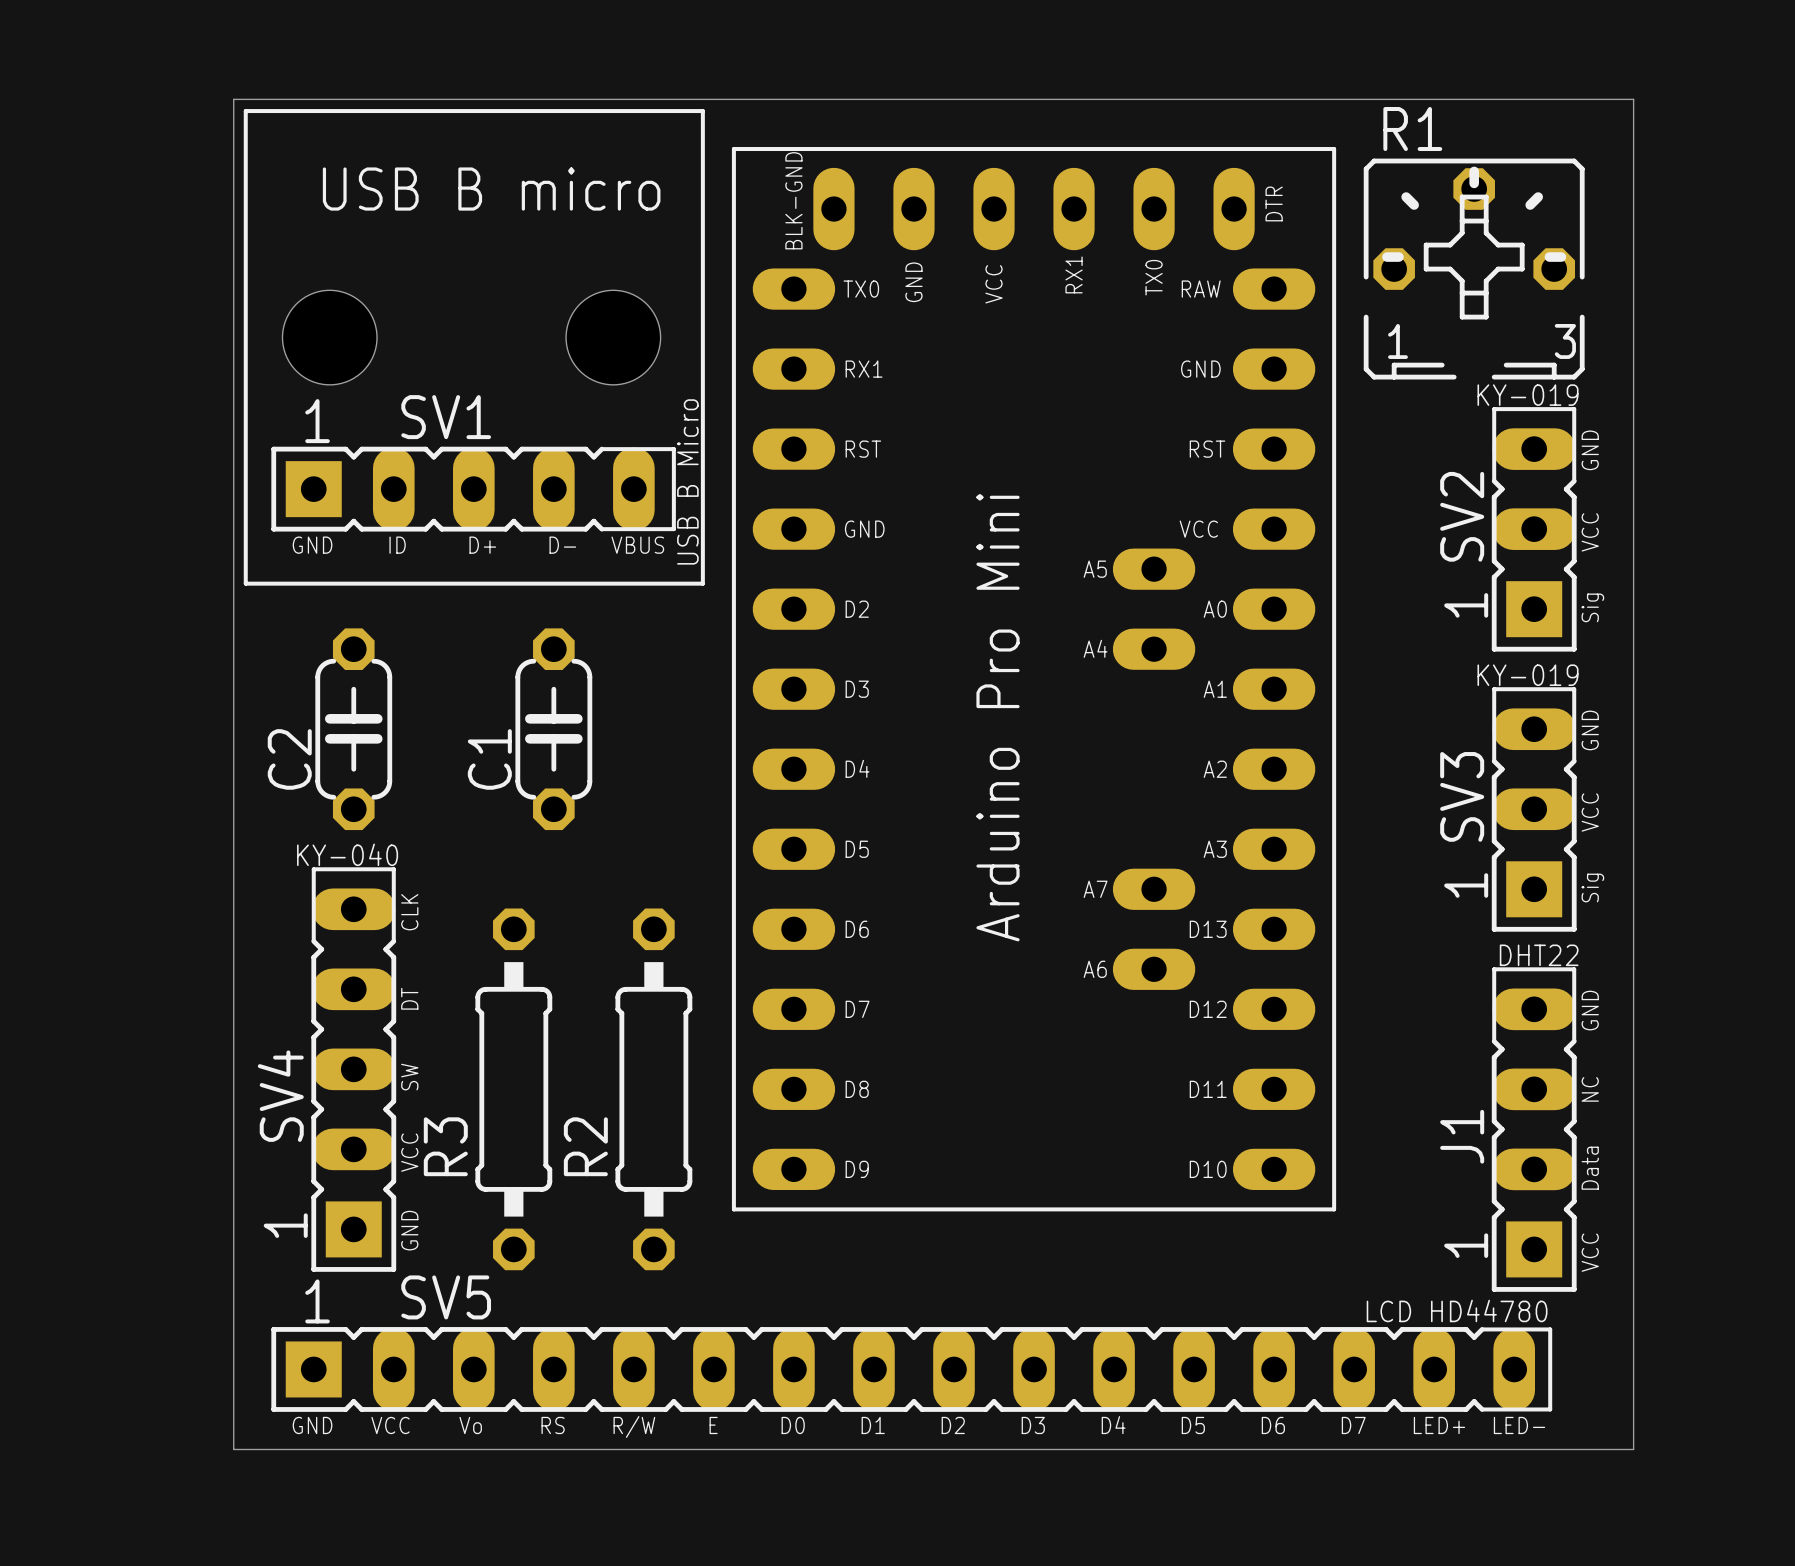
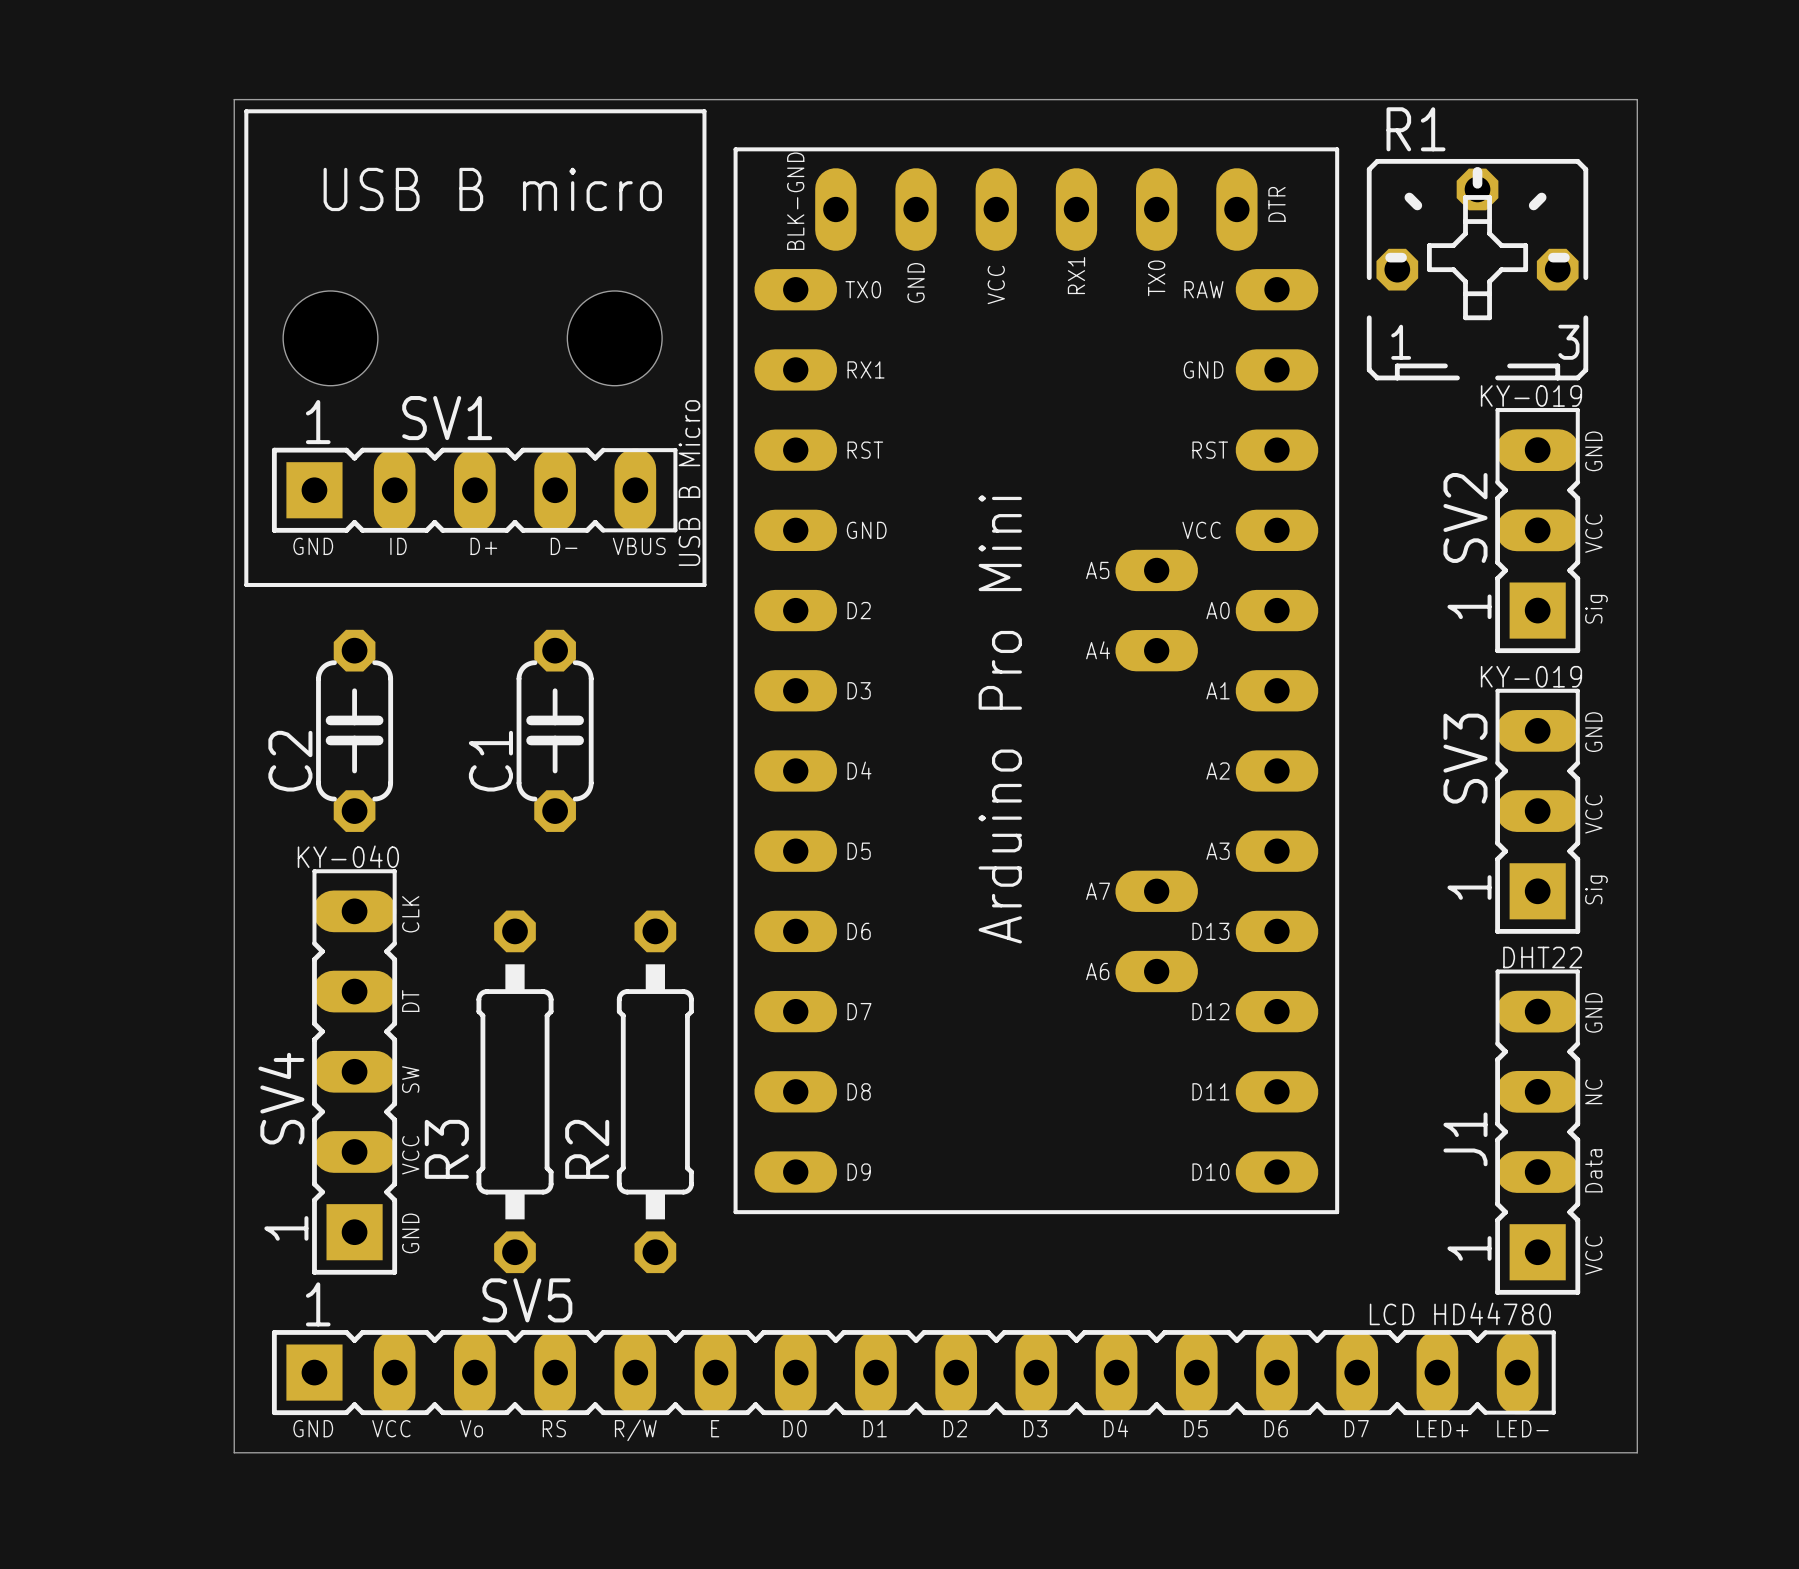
SV3 name position: SV3 (1462, 796) -> SV3 (1465, 758)
SV5 name position: SV5 (446, 1297) -> SV5 (527, 1300)

